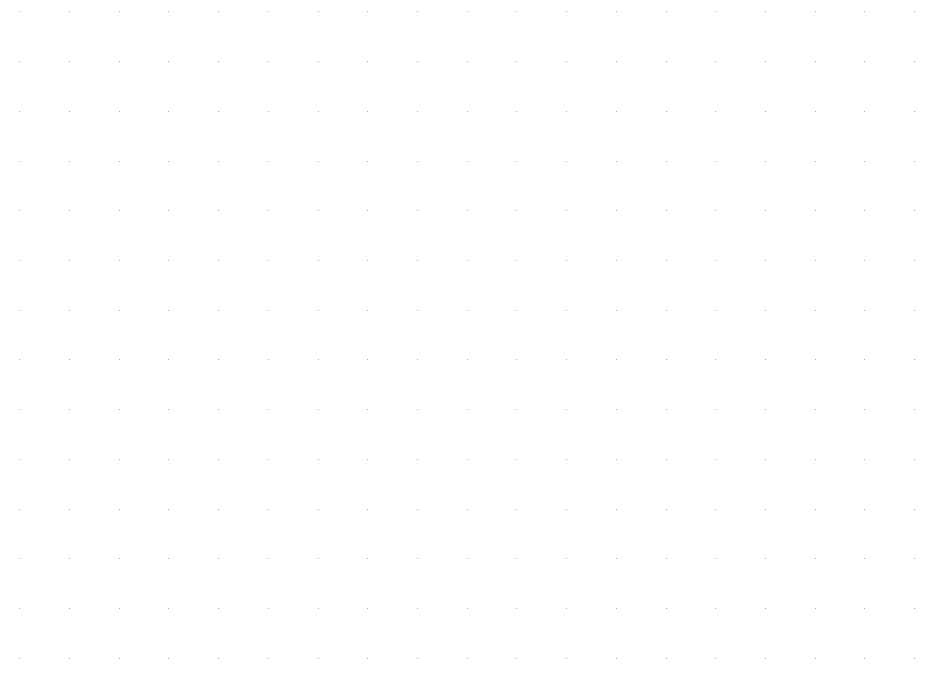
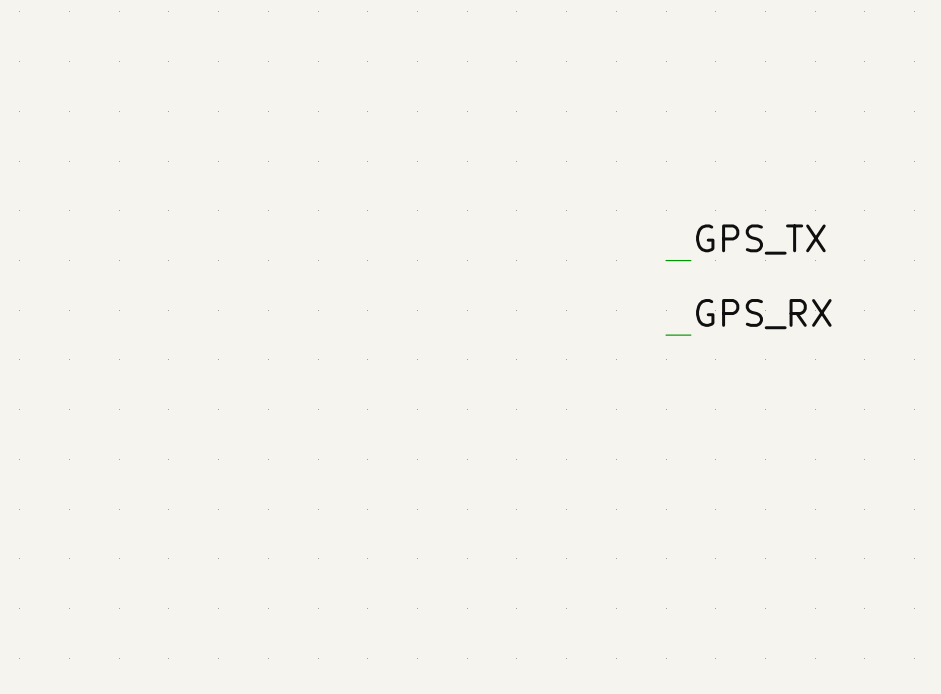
label: none -> GPS_TX (760, 239)
wire: none -> (666, 260) (690, 260)
label: none -> GPS_RX (763, 314)
wire: none -> (666, 335) (690, 335)

